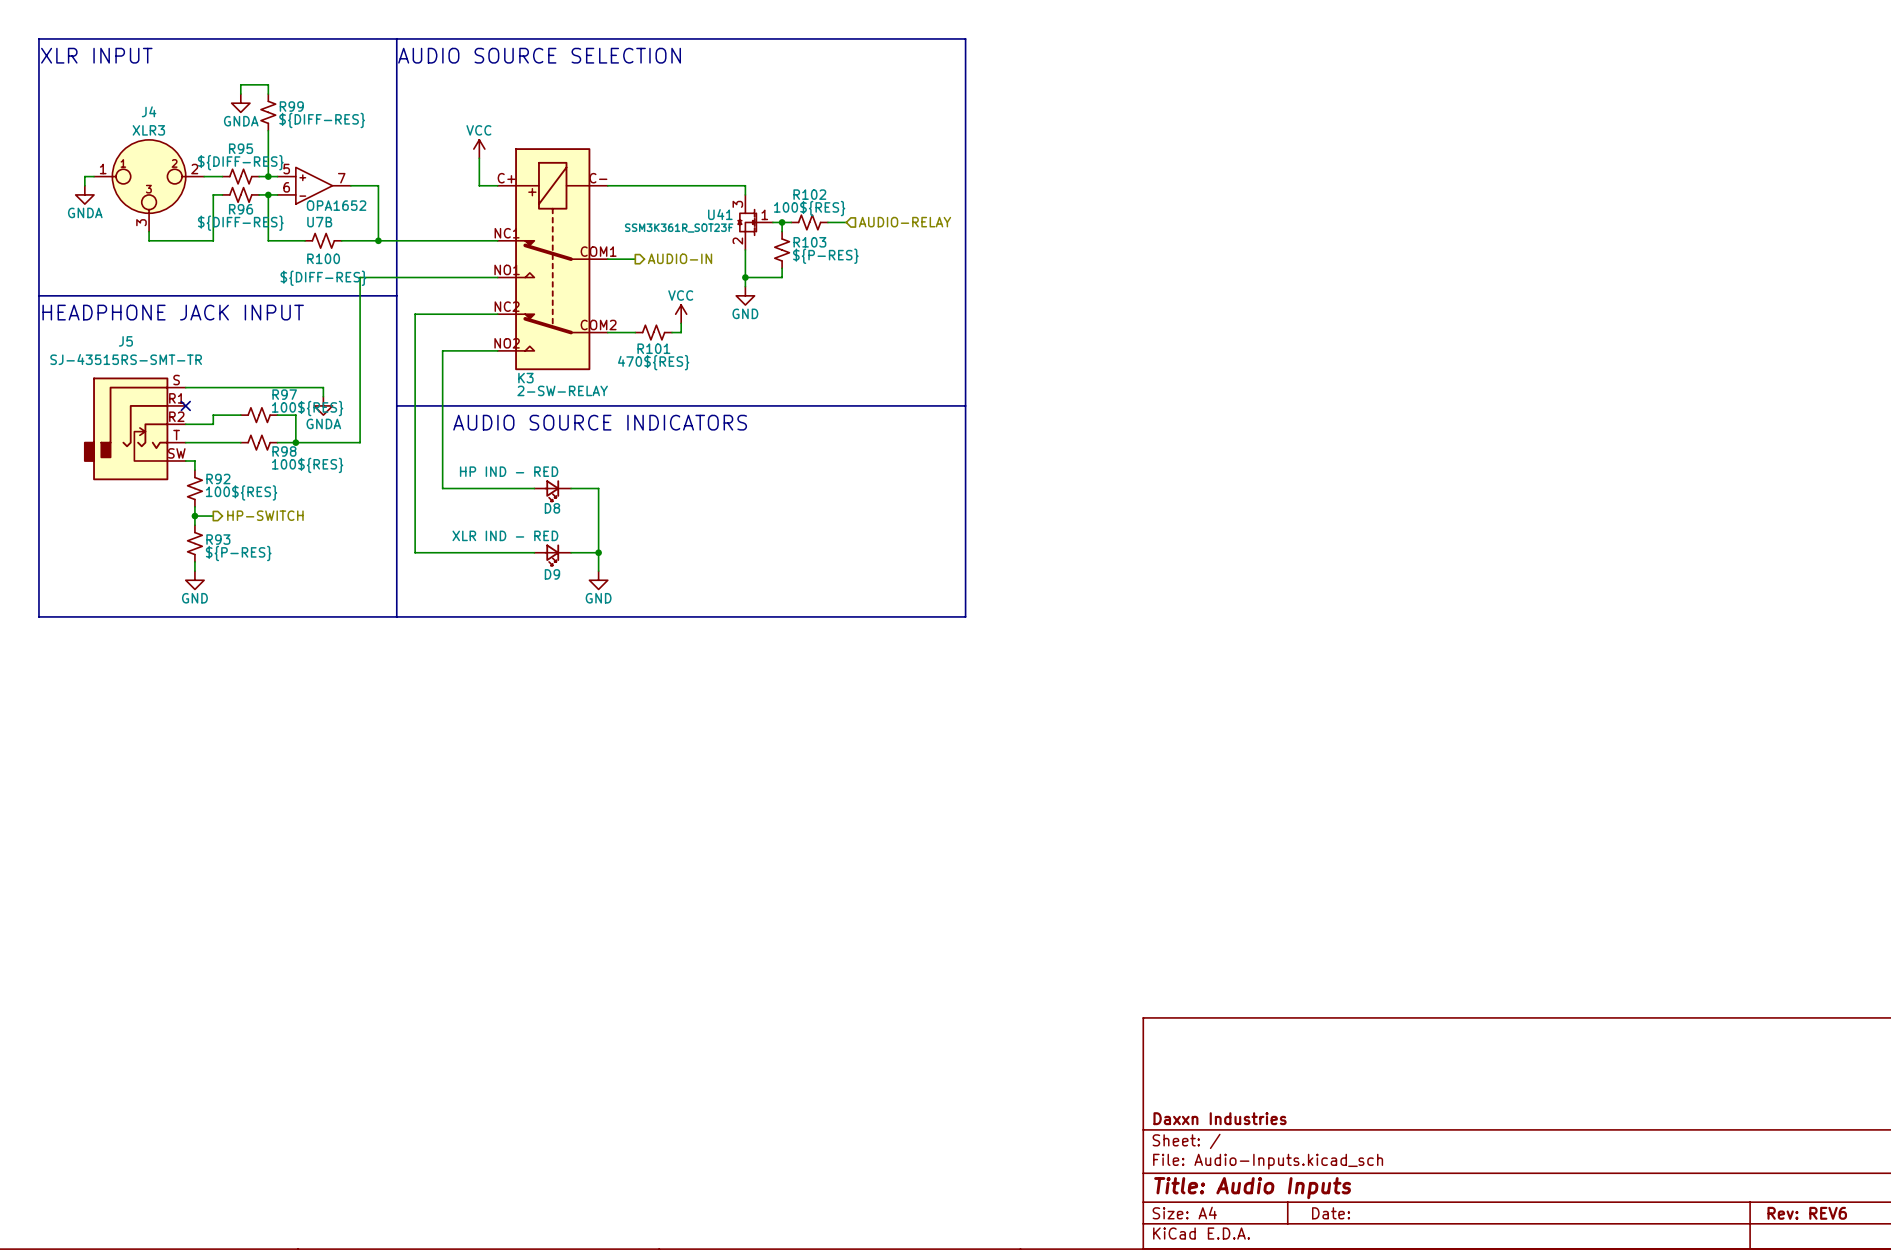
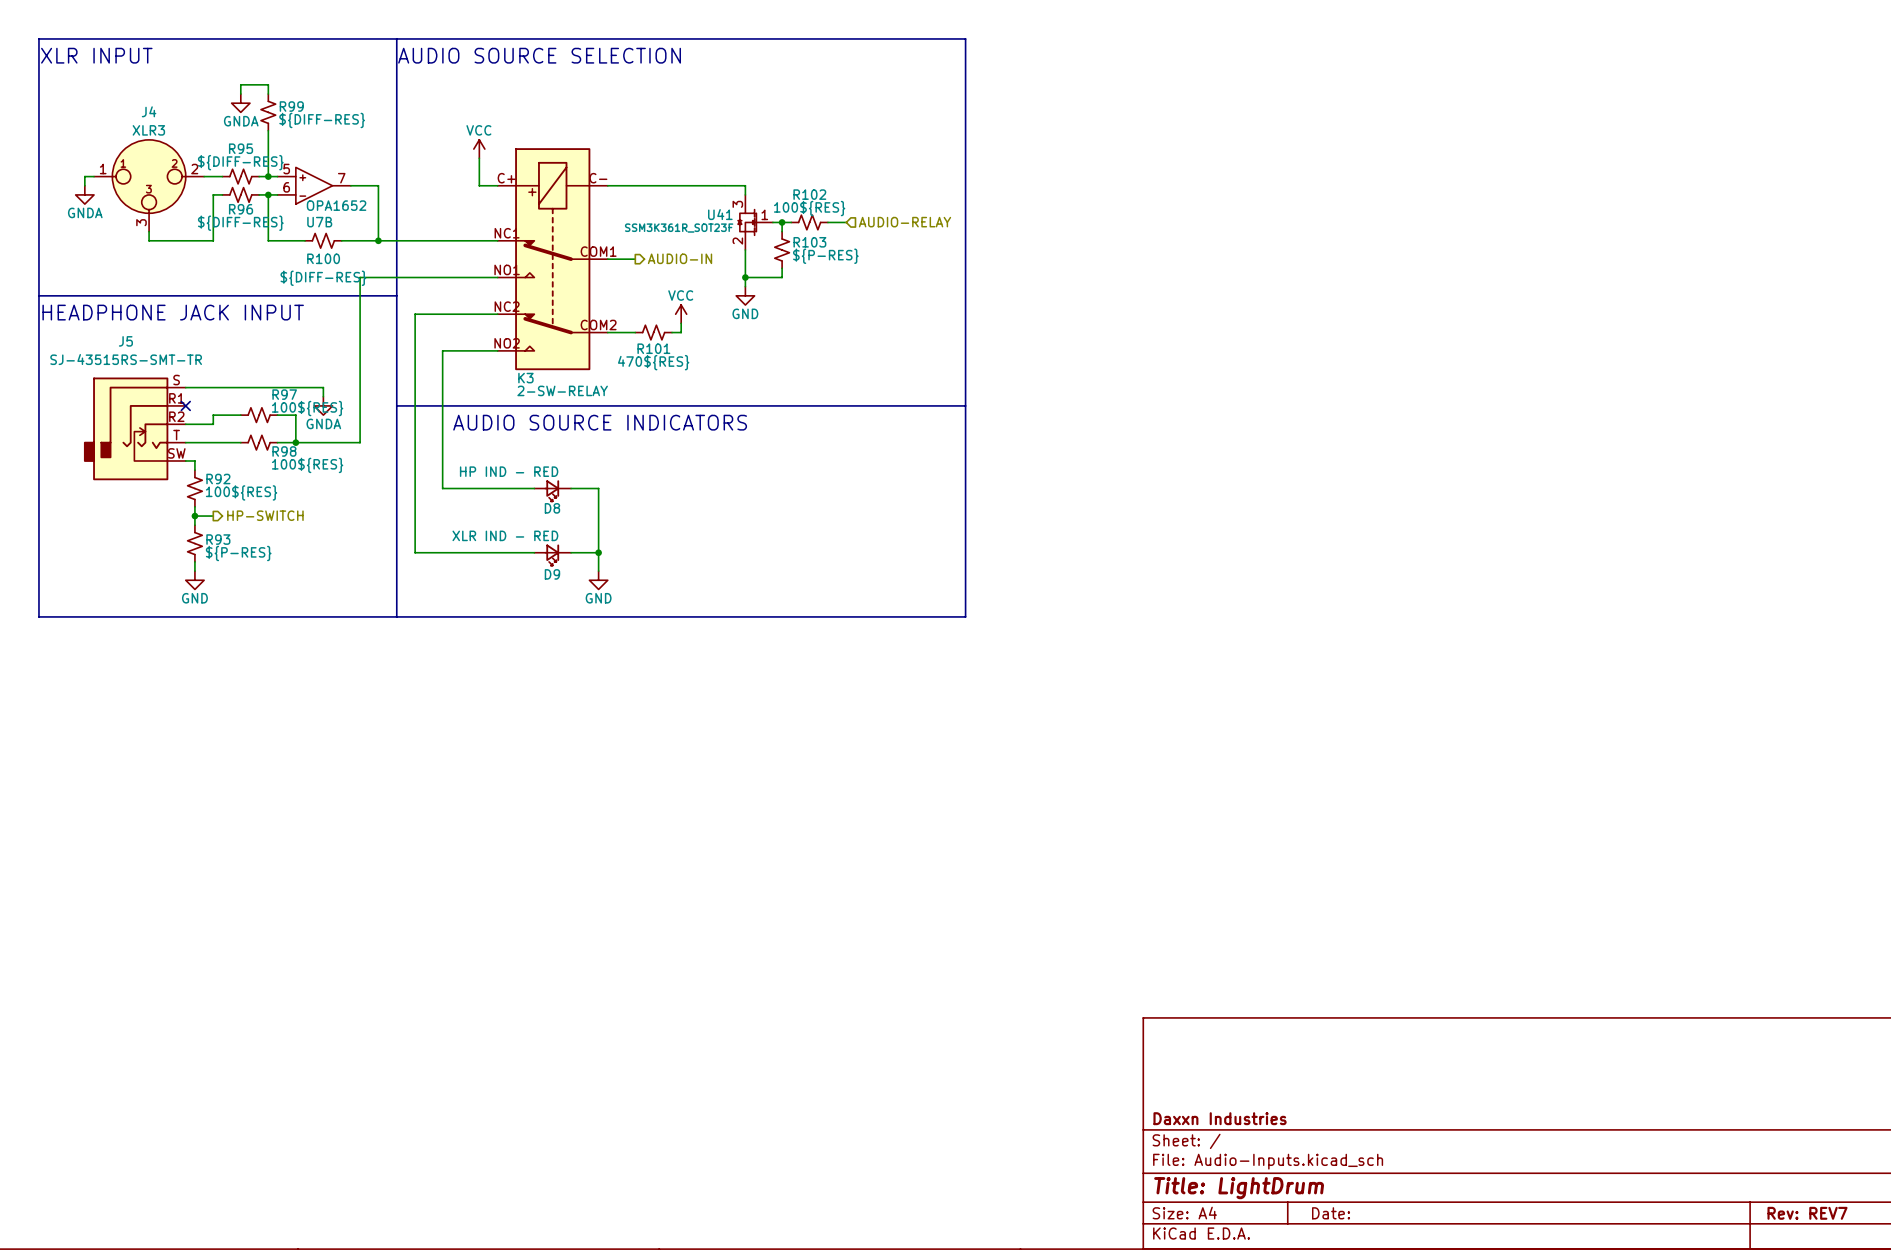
title block: Title: Audio Inputs (1252, 1188) -> Title: LightDrum (1239, 1188)
title block: Rev: REV6 (1807, 1213) -> Rev: REV7 (1807, 1213)

